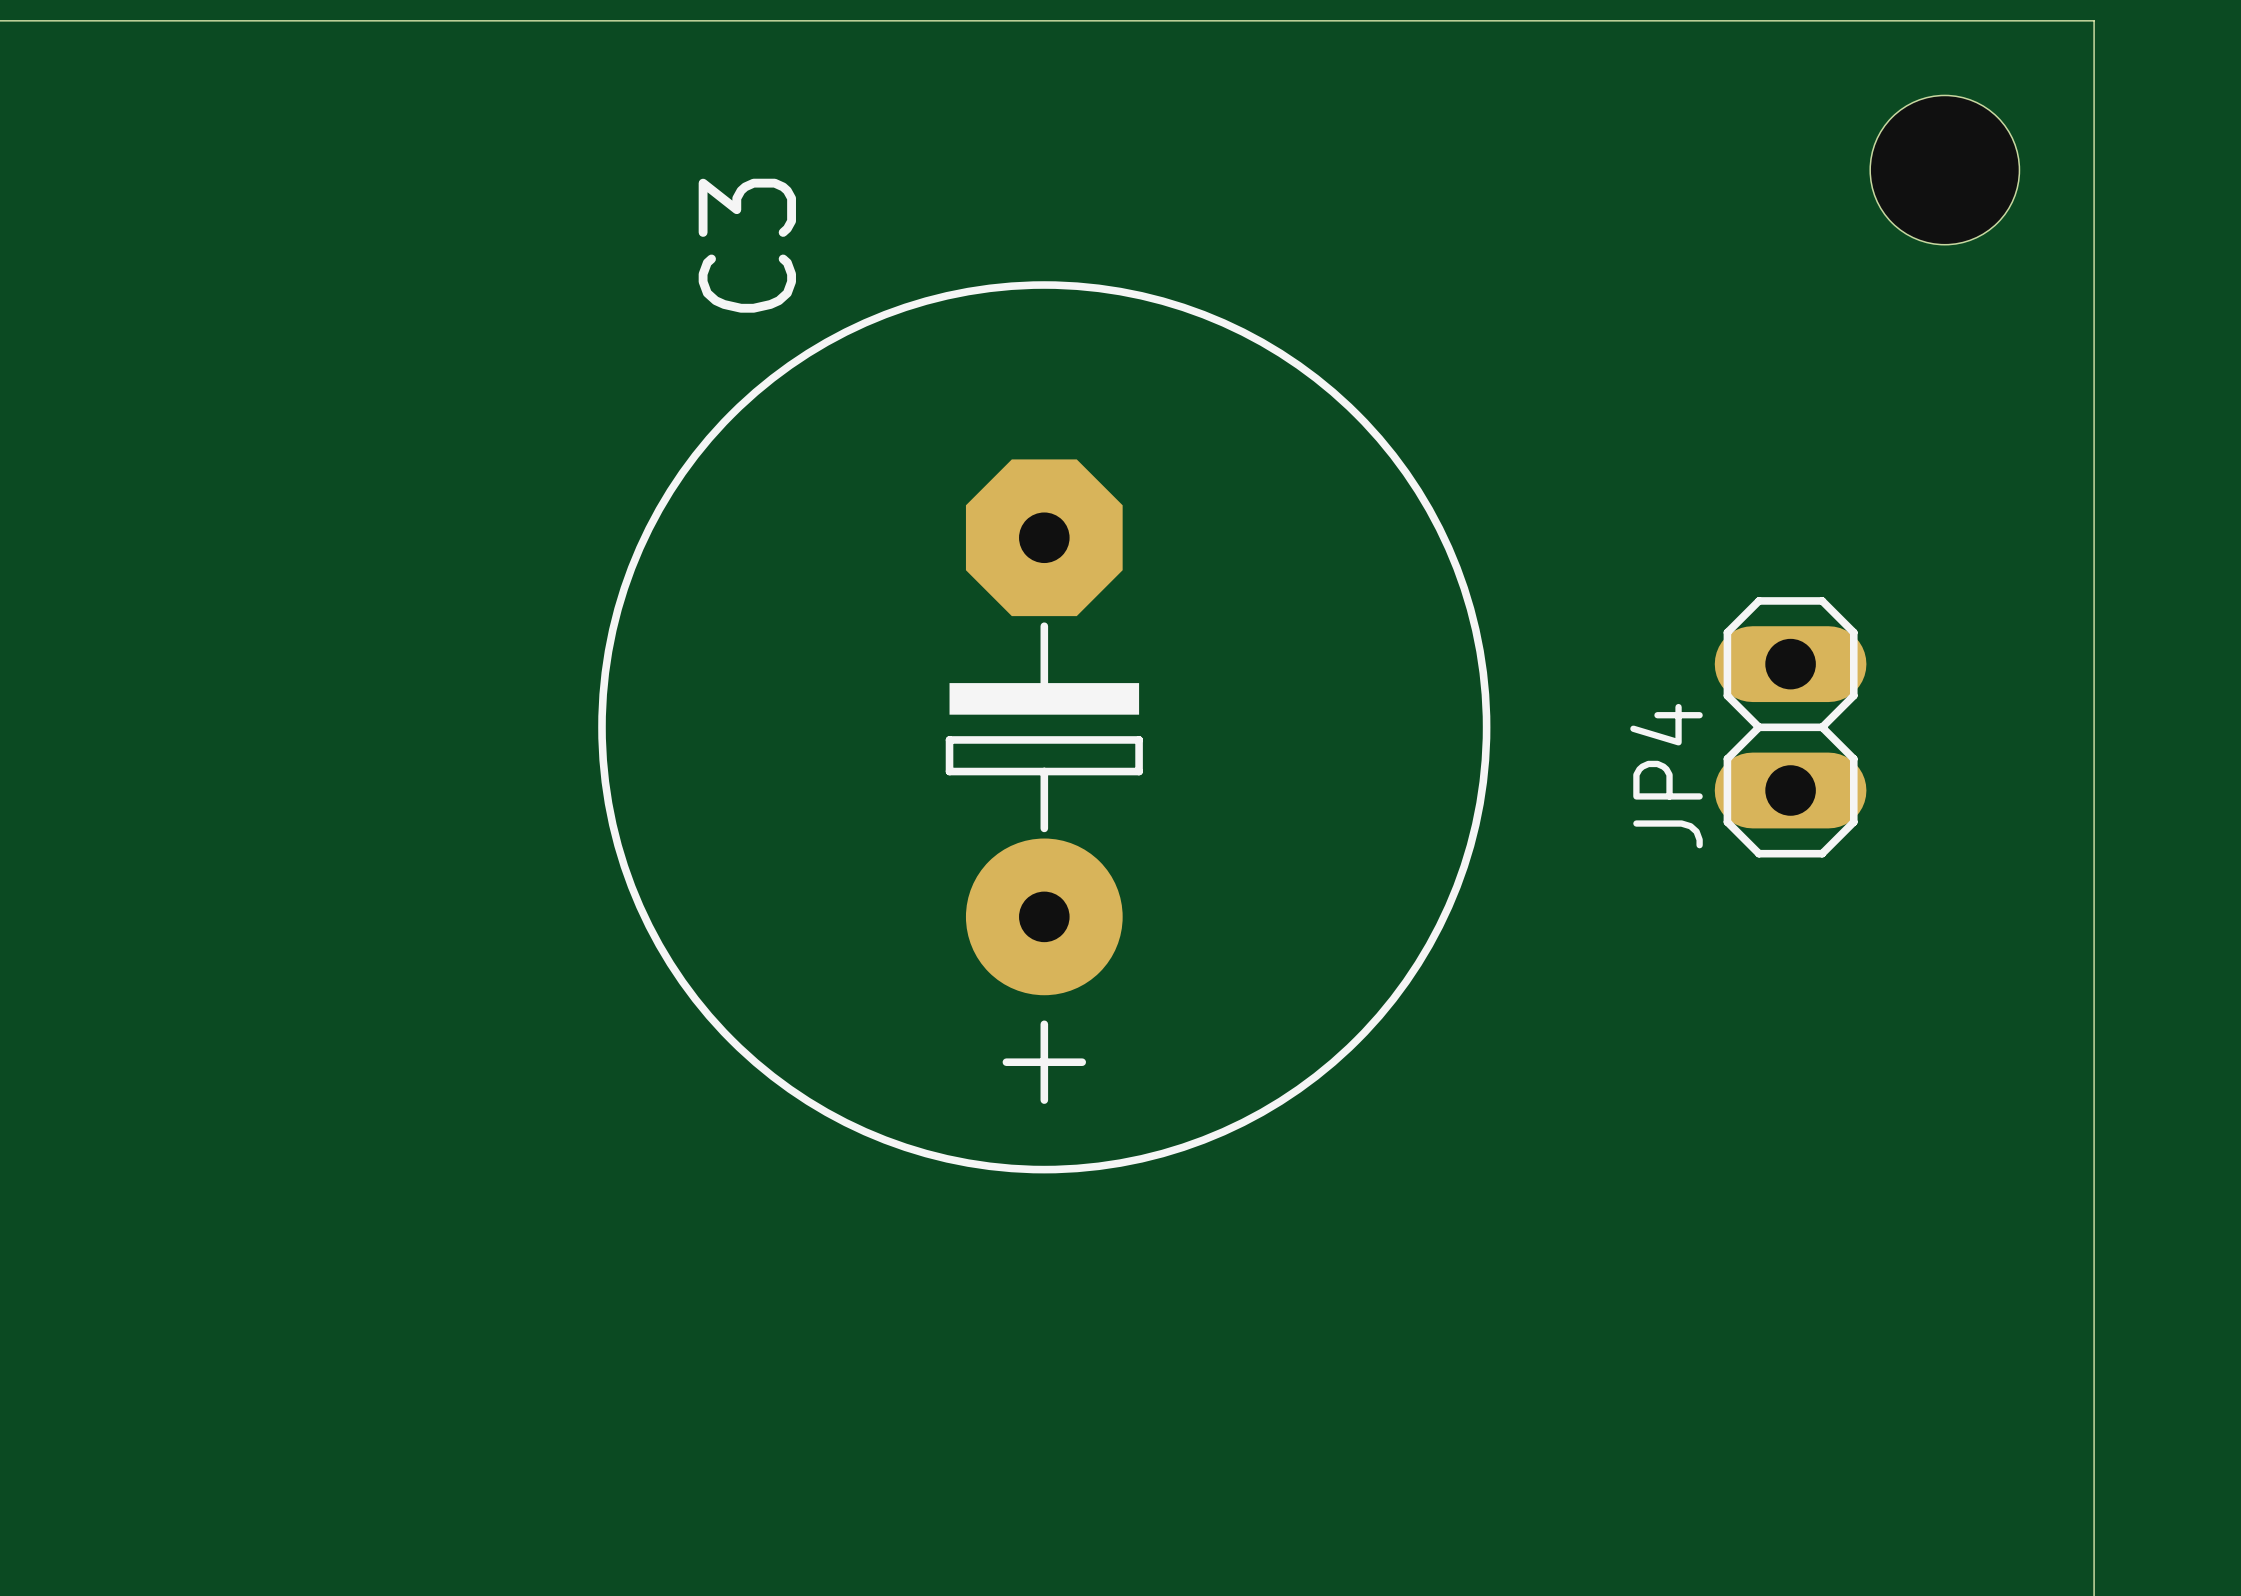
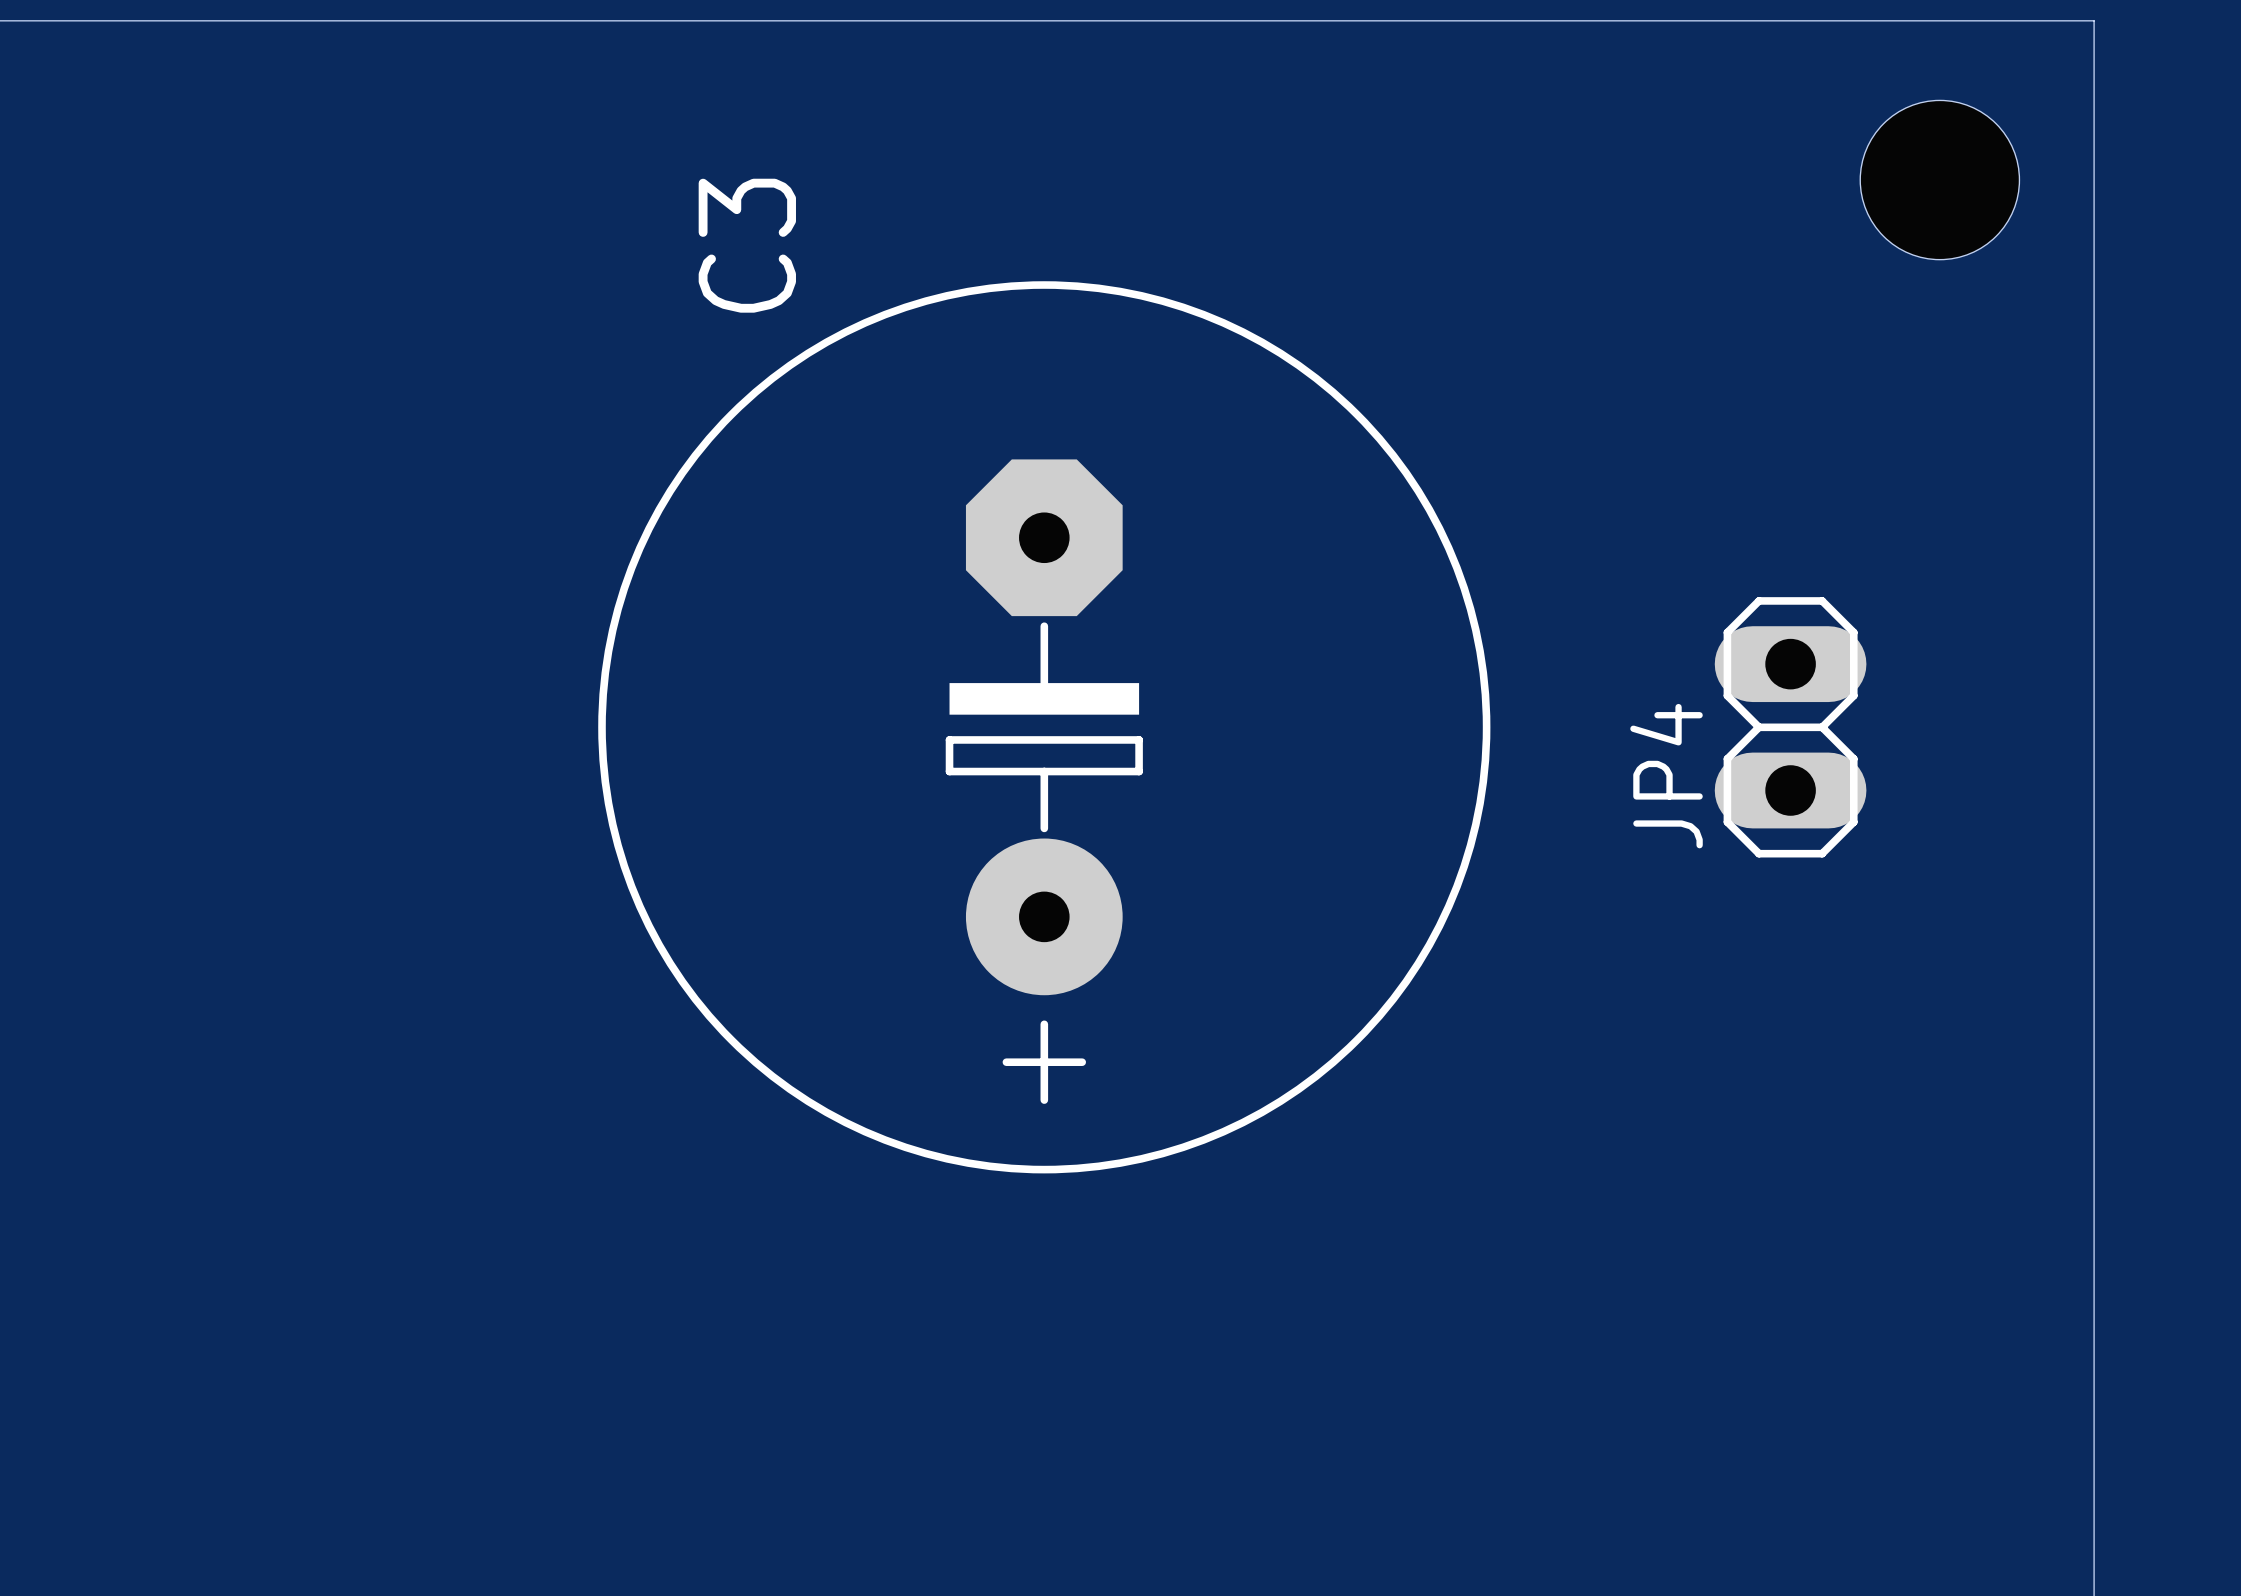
hole size: [1870, 95, 2020, 245] -> [1860, 100, 2020, 260]

